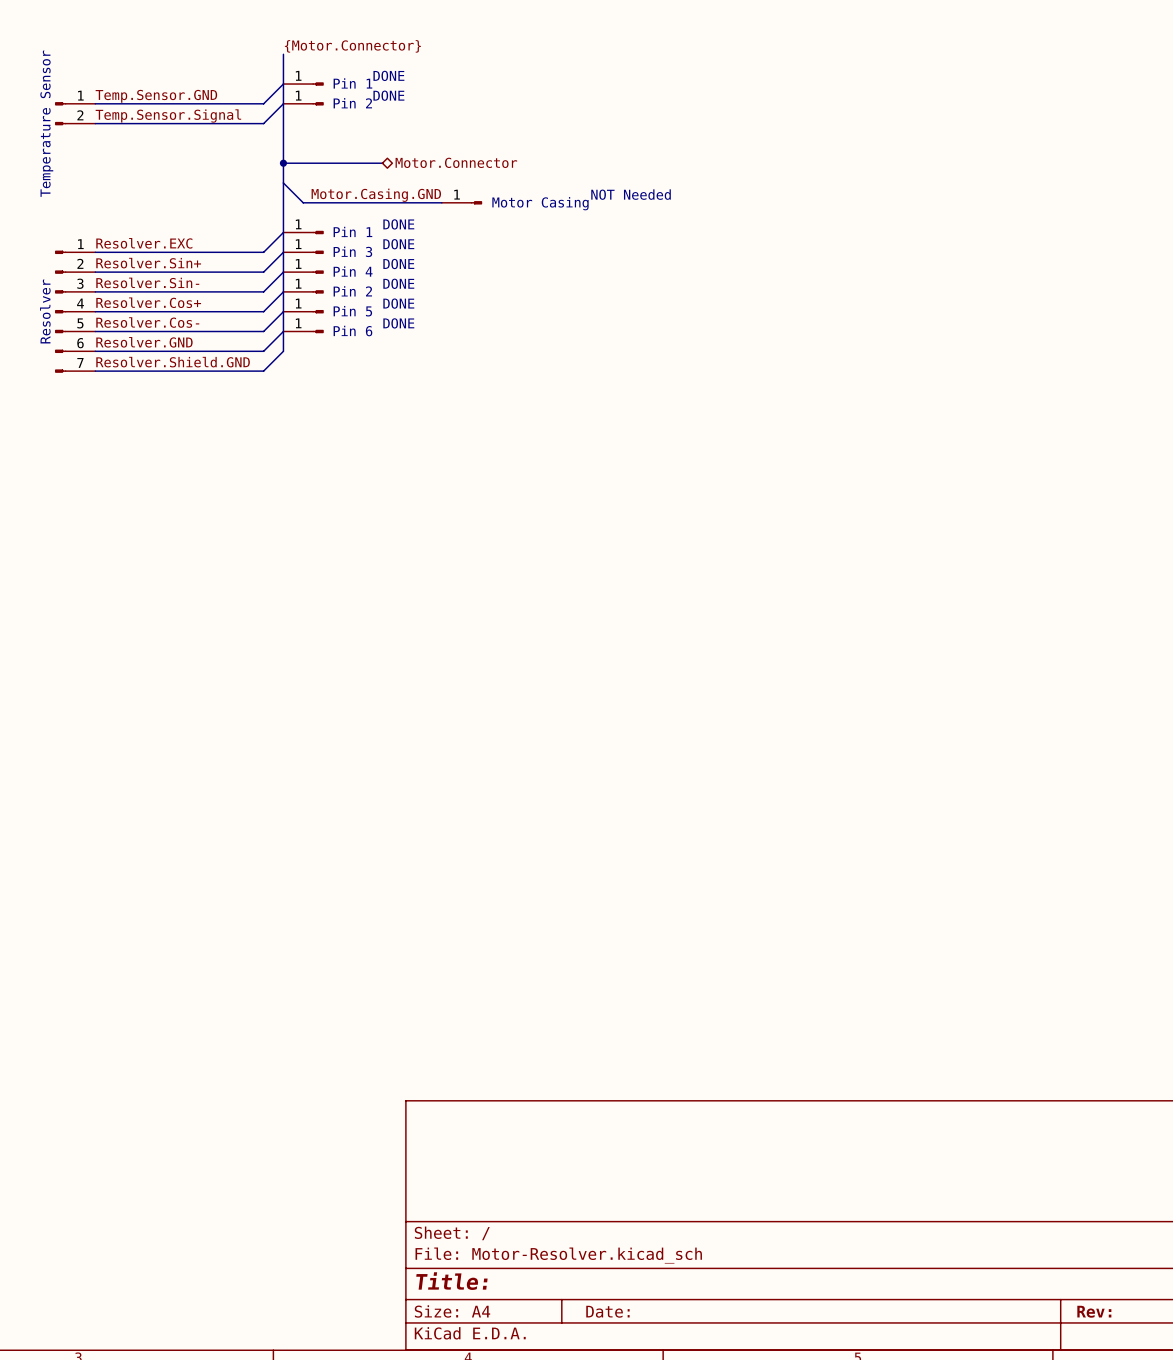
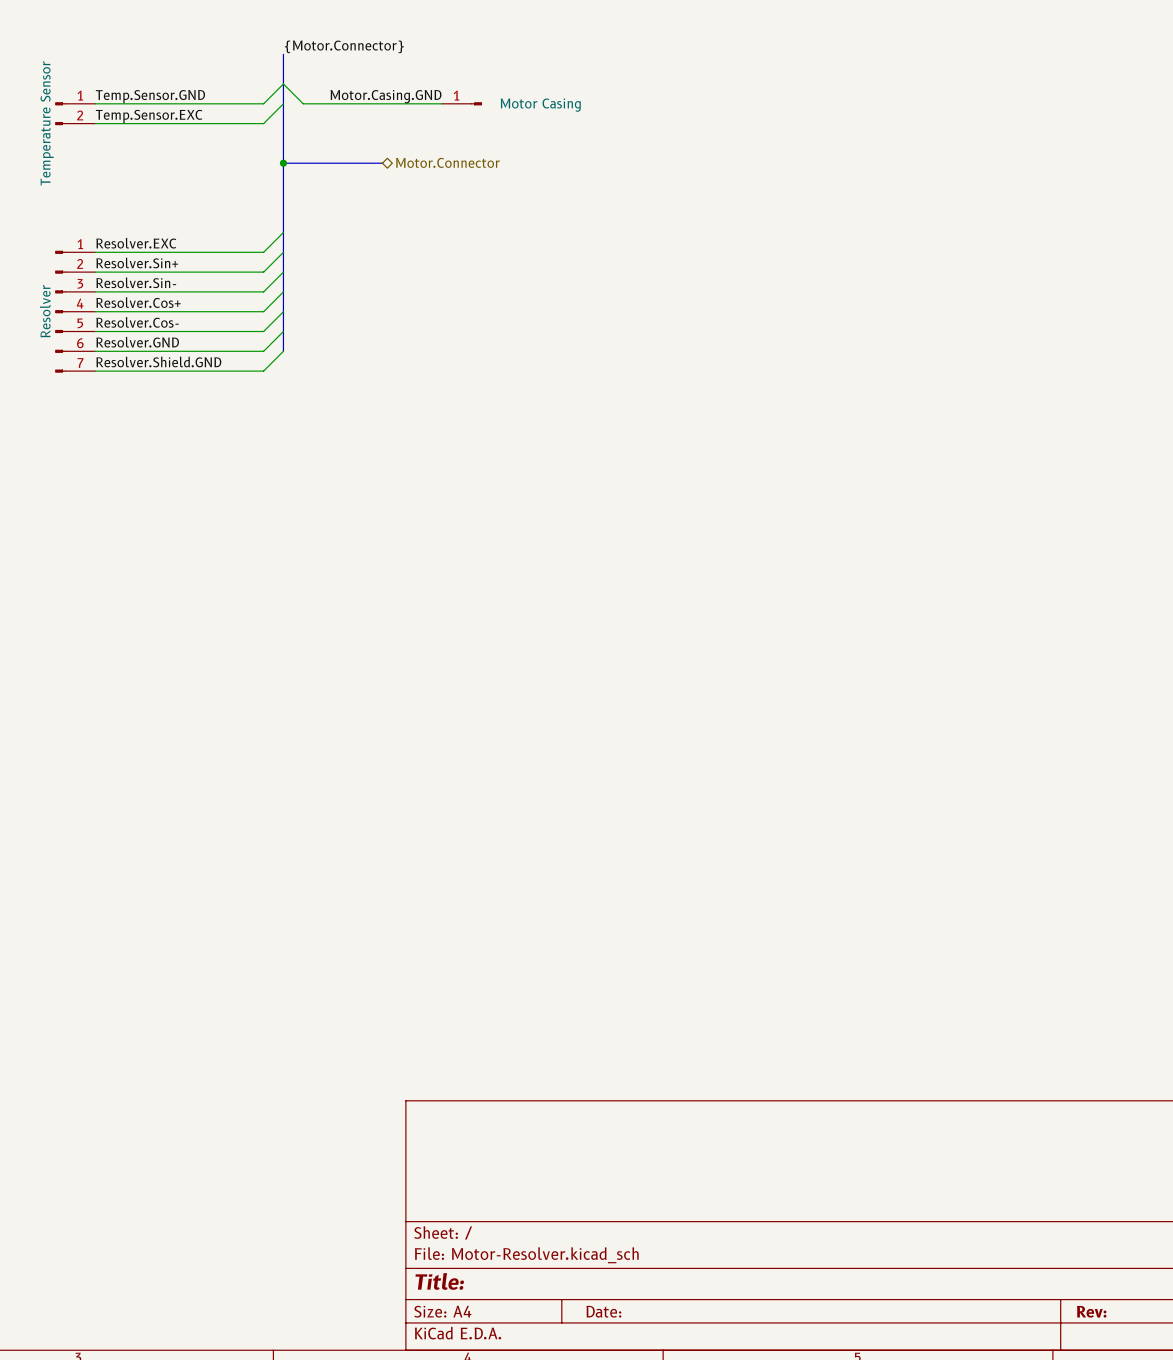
text: DONE (388, 75) -> none
part: Pin 1 (303, 84) -> none
text: DONE (388, 95) -> none
part: Pin 2 (303, 103) -> none
label: Temp.Sensor.Signal (168, 115) -> Temp.Sensor.EXC (149, 116)
wire: (283, 183) (303, 202) (441, 202) -> (283, 84) (303, 103) (441, 103)
text: NOT Needed (631, 194) -> none
label position: Motor.Casing.GND (376, 195) -> Motor.Casing.GND (386, 96)
part position: (461, 202) -> (461, 103)
text: DONE (398, 224) -> none
part: Pin 1 (303, 232) -> none
text: DONE (398, 244) -> none
part: Pin 3 (303, 252) -> none
text: DONE (398, 264) -> none
part: Pin 4 (303, 272) -> none
text: DONE (398, 283) -> none
part: Pin 2 (303, 291) -> none
text: DONE (398, 303) -> none
part: Pin 5 (303, 311) -> none
text: DONE (398, 323) -> none
part: Pin 6 (303, 331) -> none

